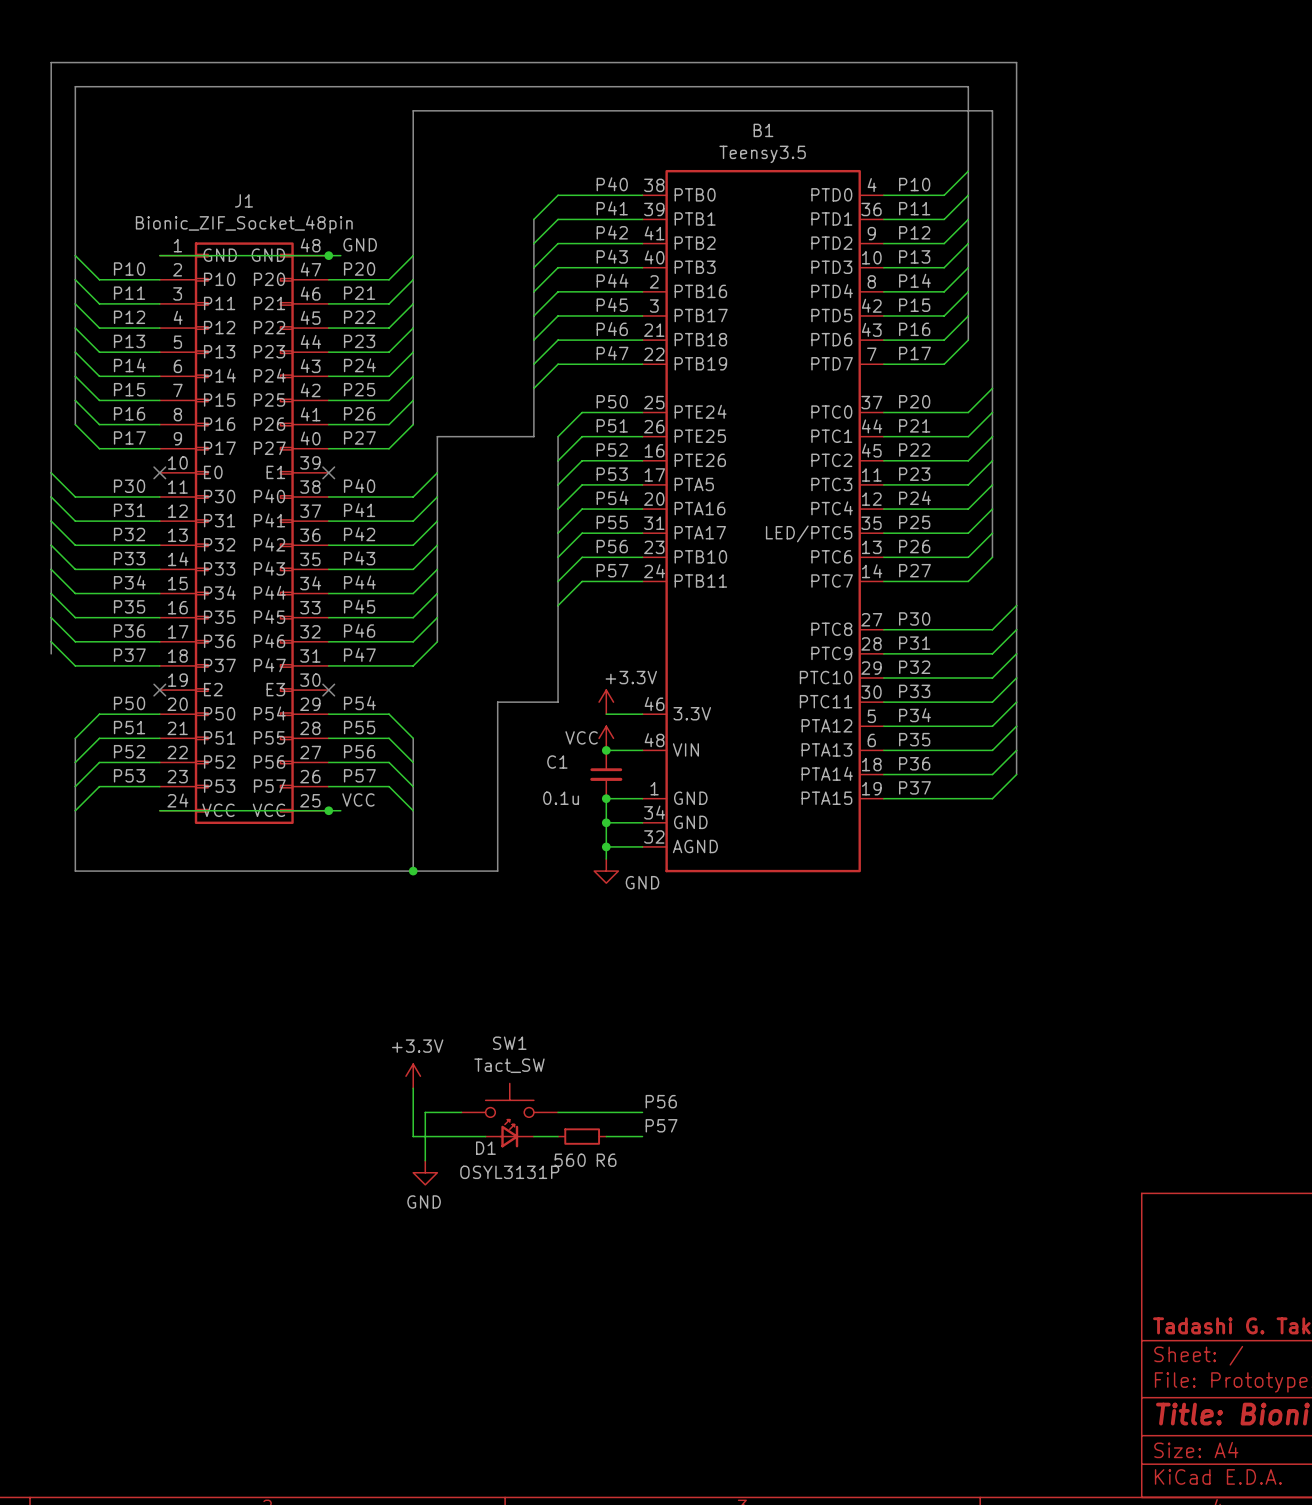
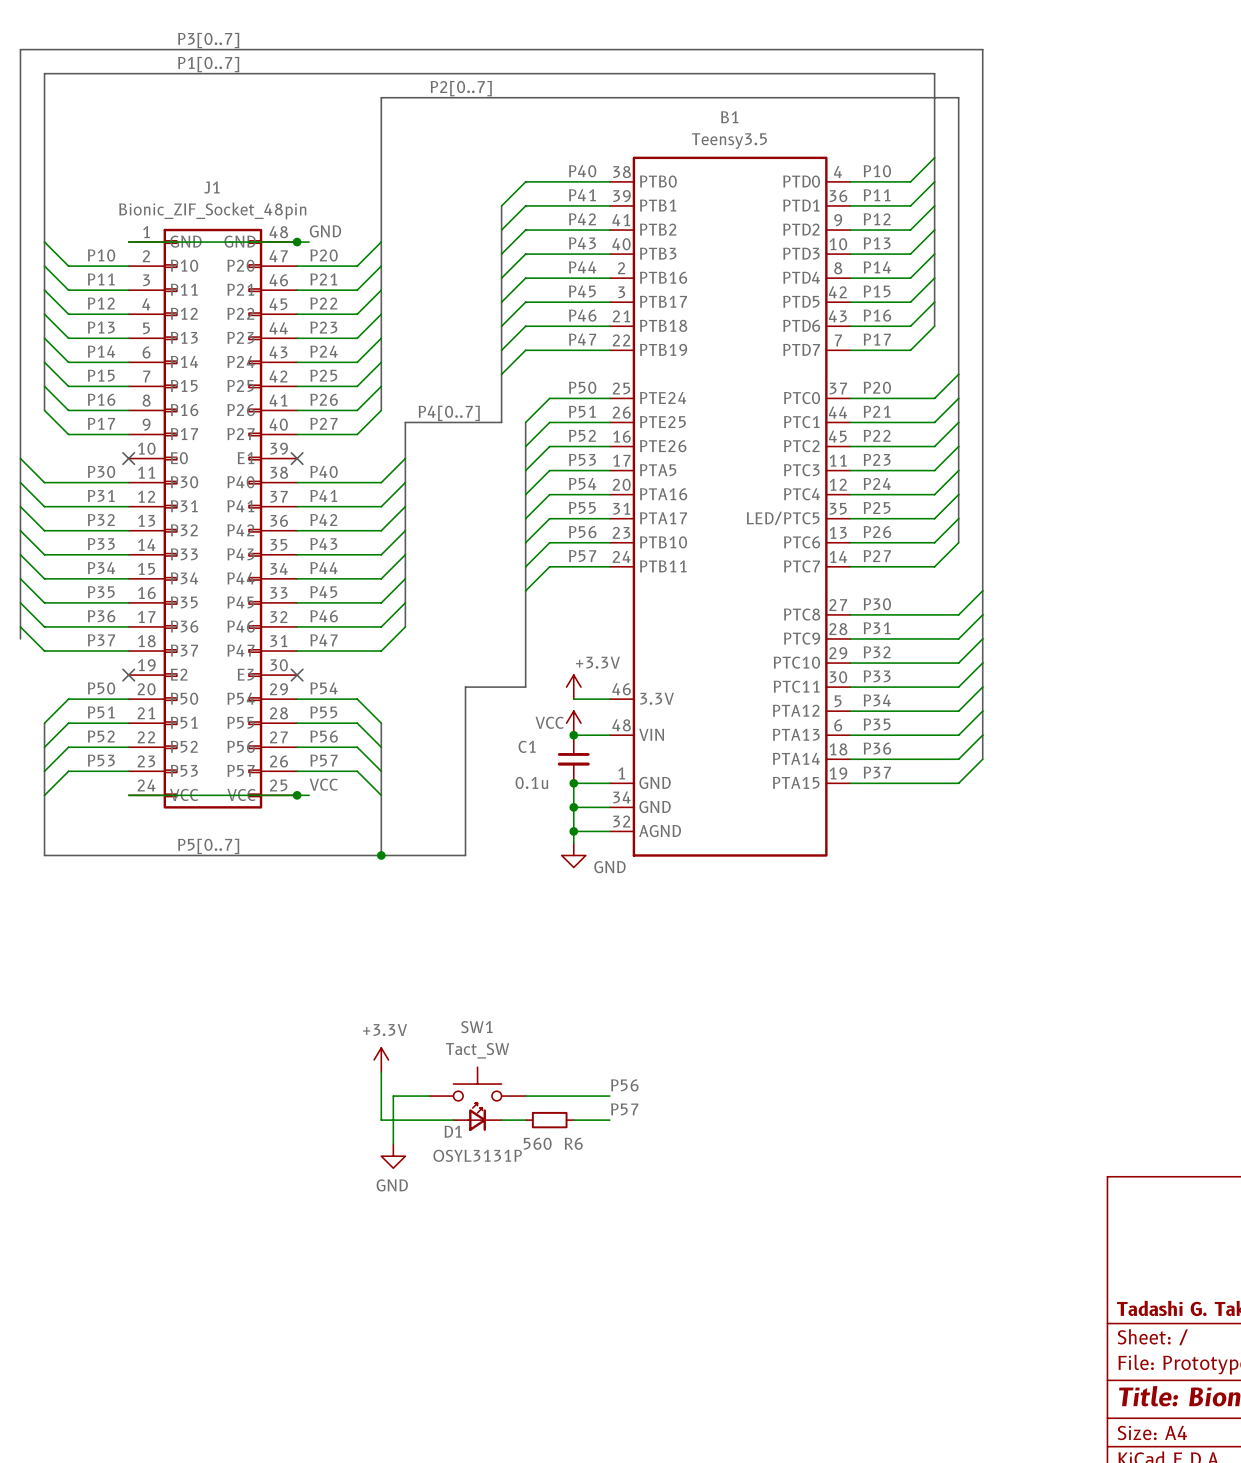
label: none -> P3[0..7] (208, 40)
label: none -> P1[0..7] (208, 64)
label: none -> P2[0..7] (461, 88)
label: none -> P4[0..7] (449, 413)
label: none -> P5[0..7] (208, 846)

